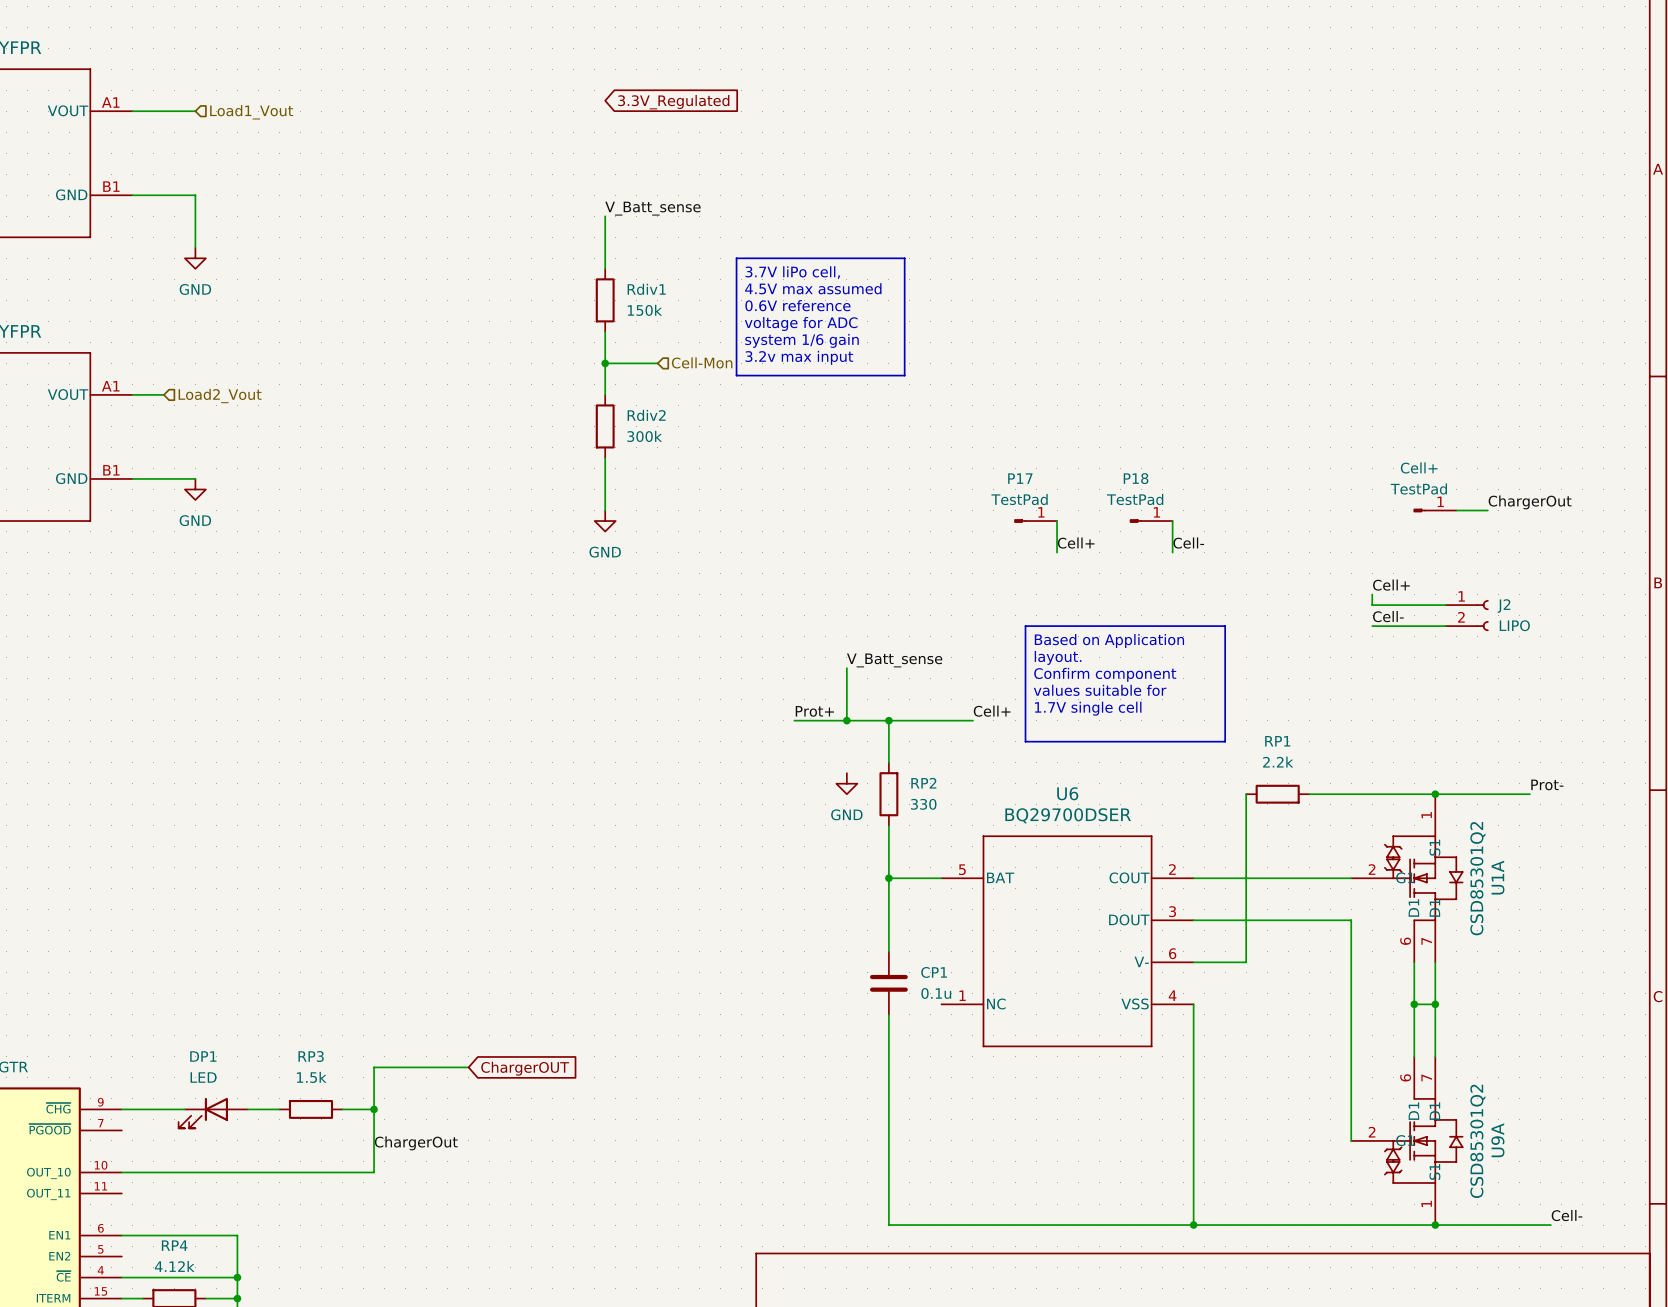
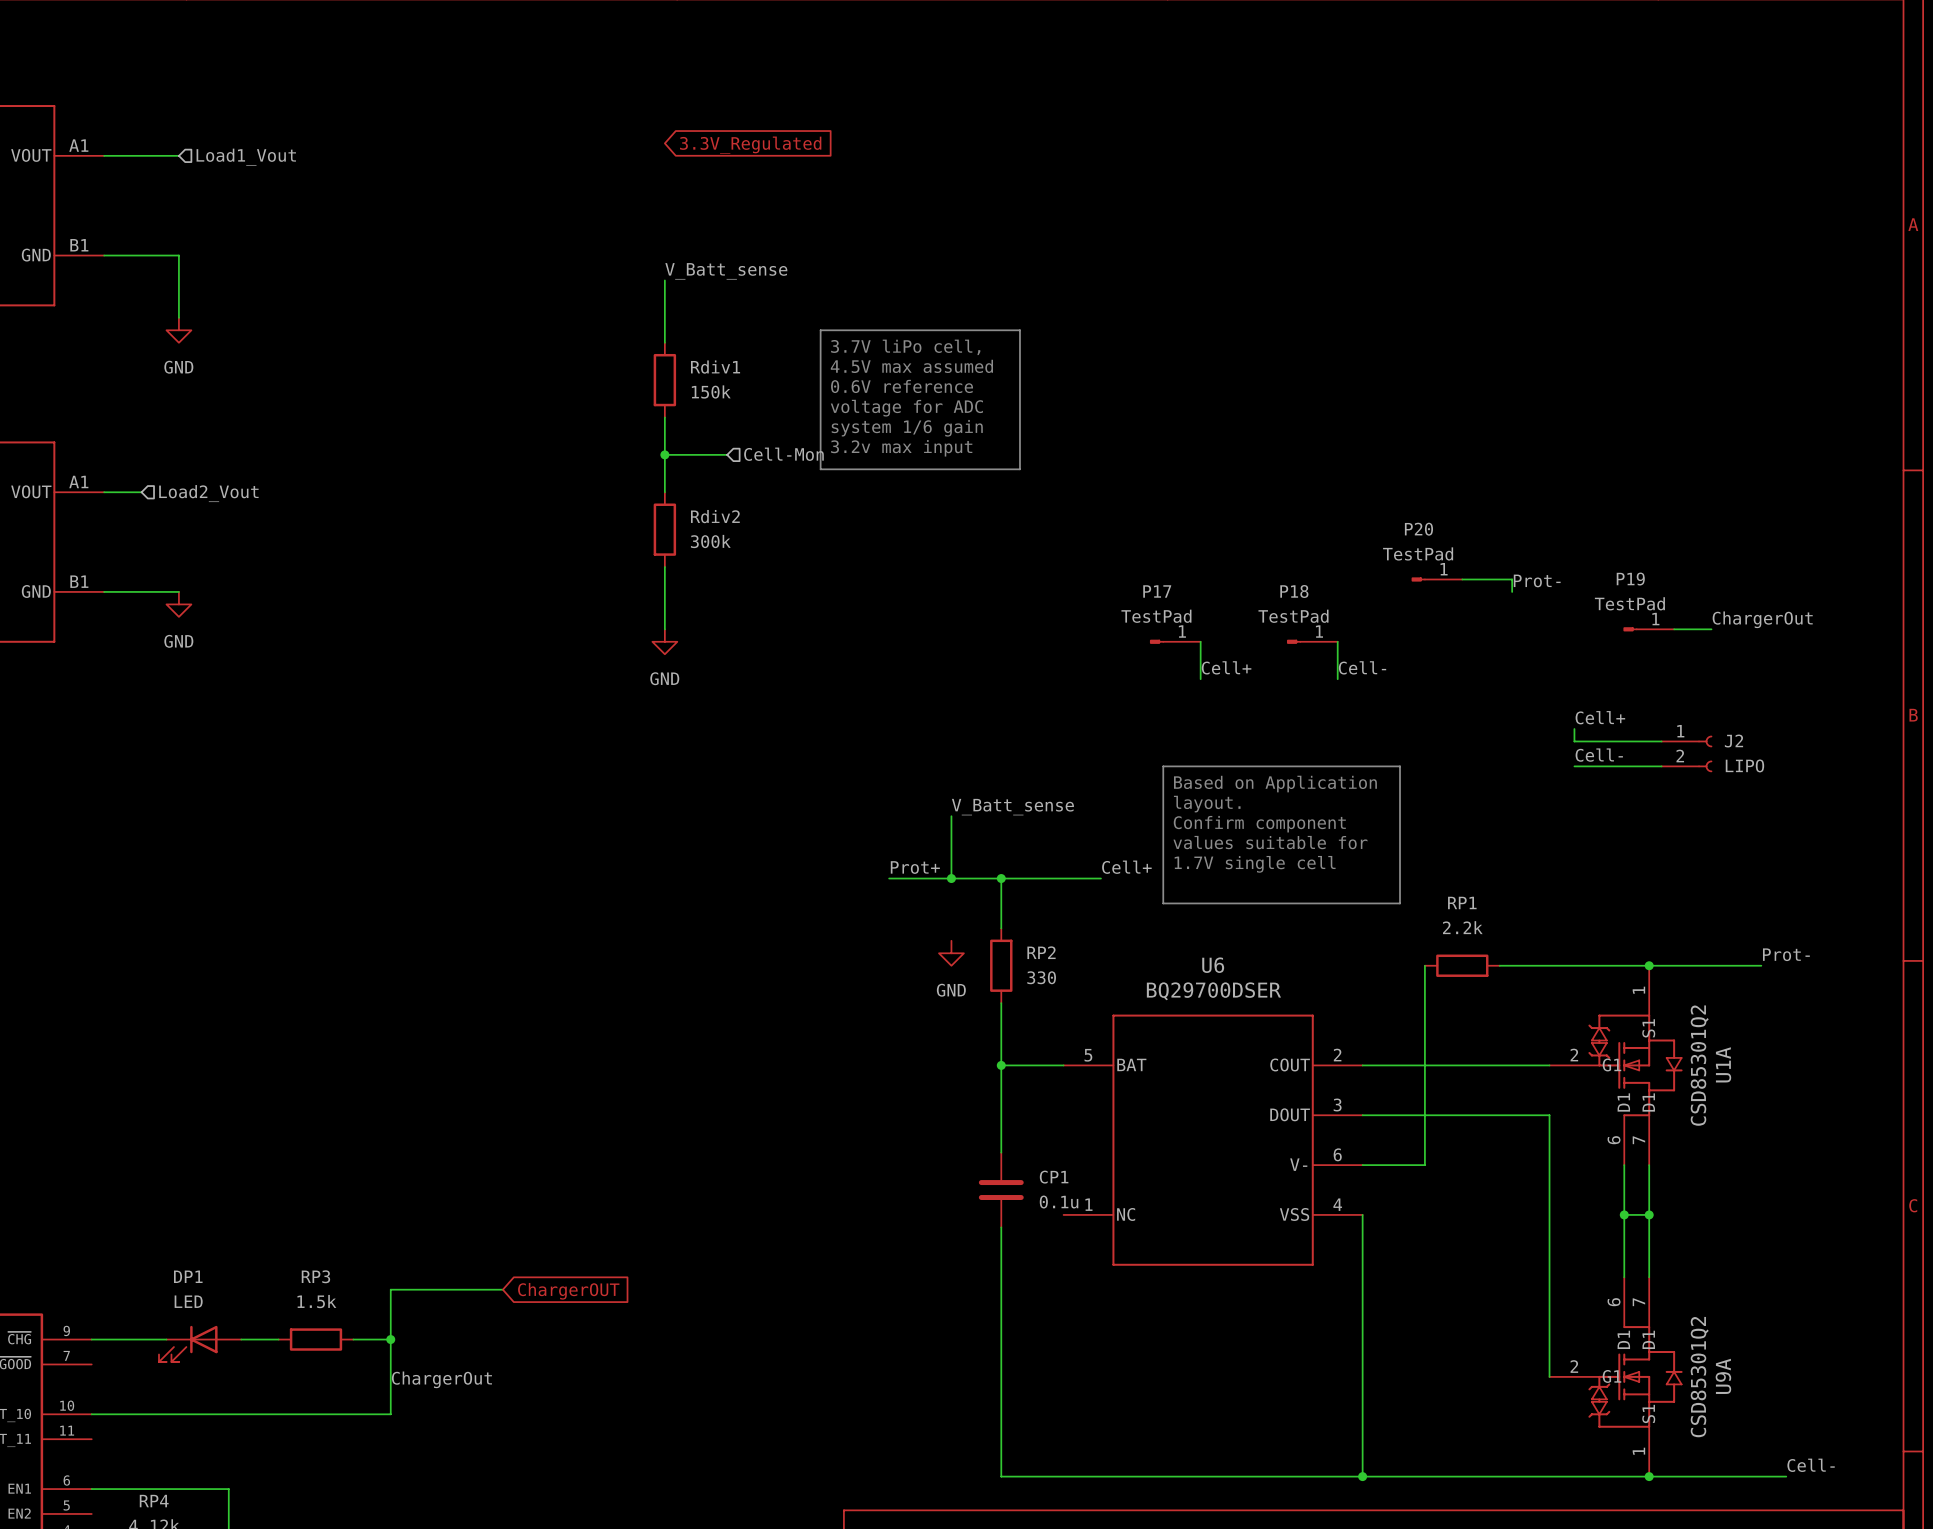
Cell+ name: Cell+ (1419, 467) -> P19 (1630, 579)
P20: none -> TestPad (1437, 579)
wire: none -> (1462, 579) (1512, 579) (1512, 591)
label: none -> Prot- (1537, 580)

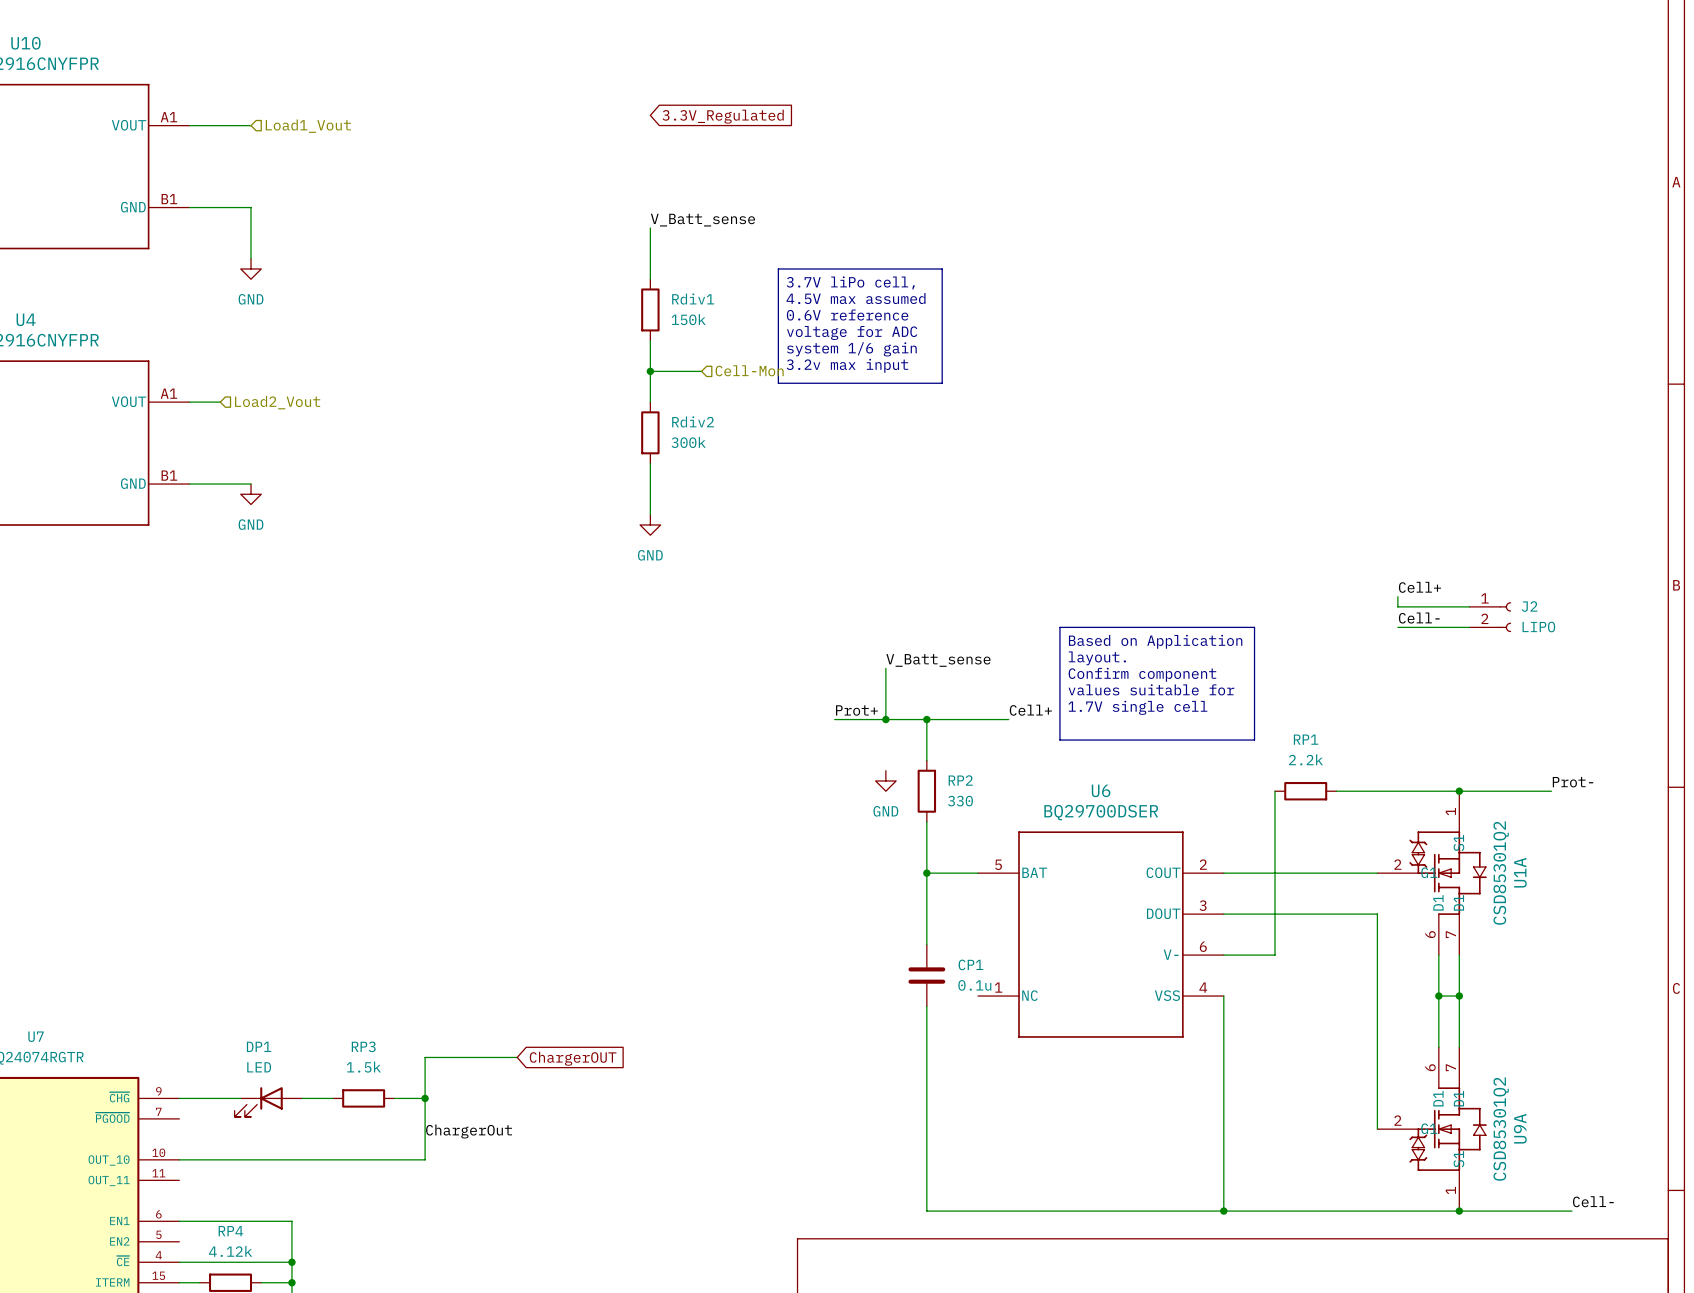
P20: TestPad (1437, 579) -> none
wire: (1462, 579) (1512, 579) (1512, 591) -> none
label: Prot- (1537, 580) -> none
label: ChargerOut (1762, 619) -> none
P19: TestPad (1648, 629) -> none
wire: (1674, 629) (1711, 629) -> none
P17: TestPad (1175, 641) -> none
wire: (1200, 641) (1200, 679) -> none
P18: TestPad (1312, 641) -> none
wire: (1337, 641) (1337, 679) -> none
label: Cell+ (1226, 667) -> none
label: Cell- (1362, 667) -> none

